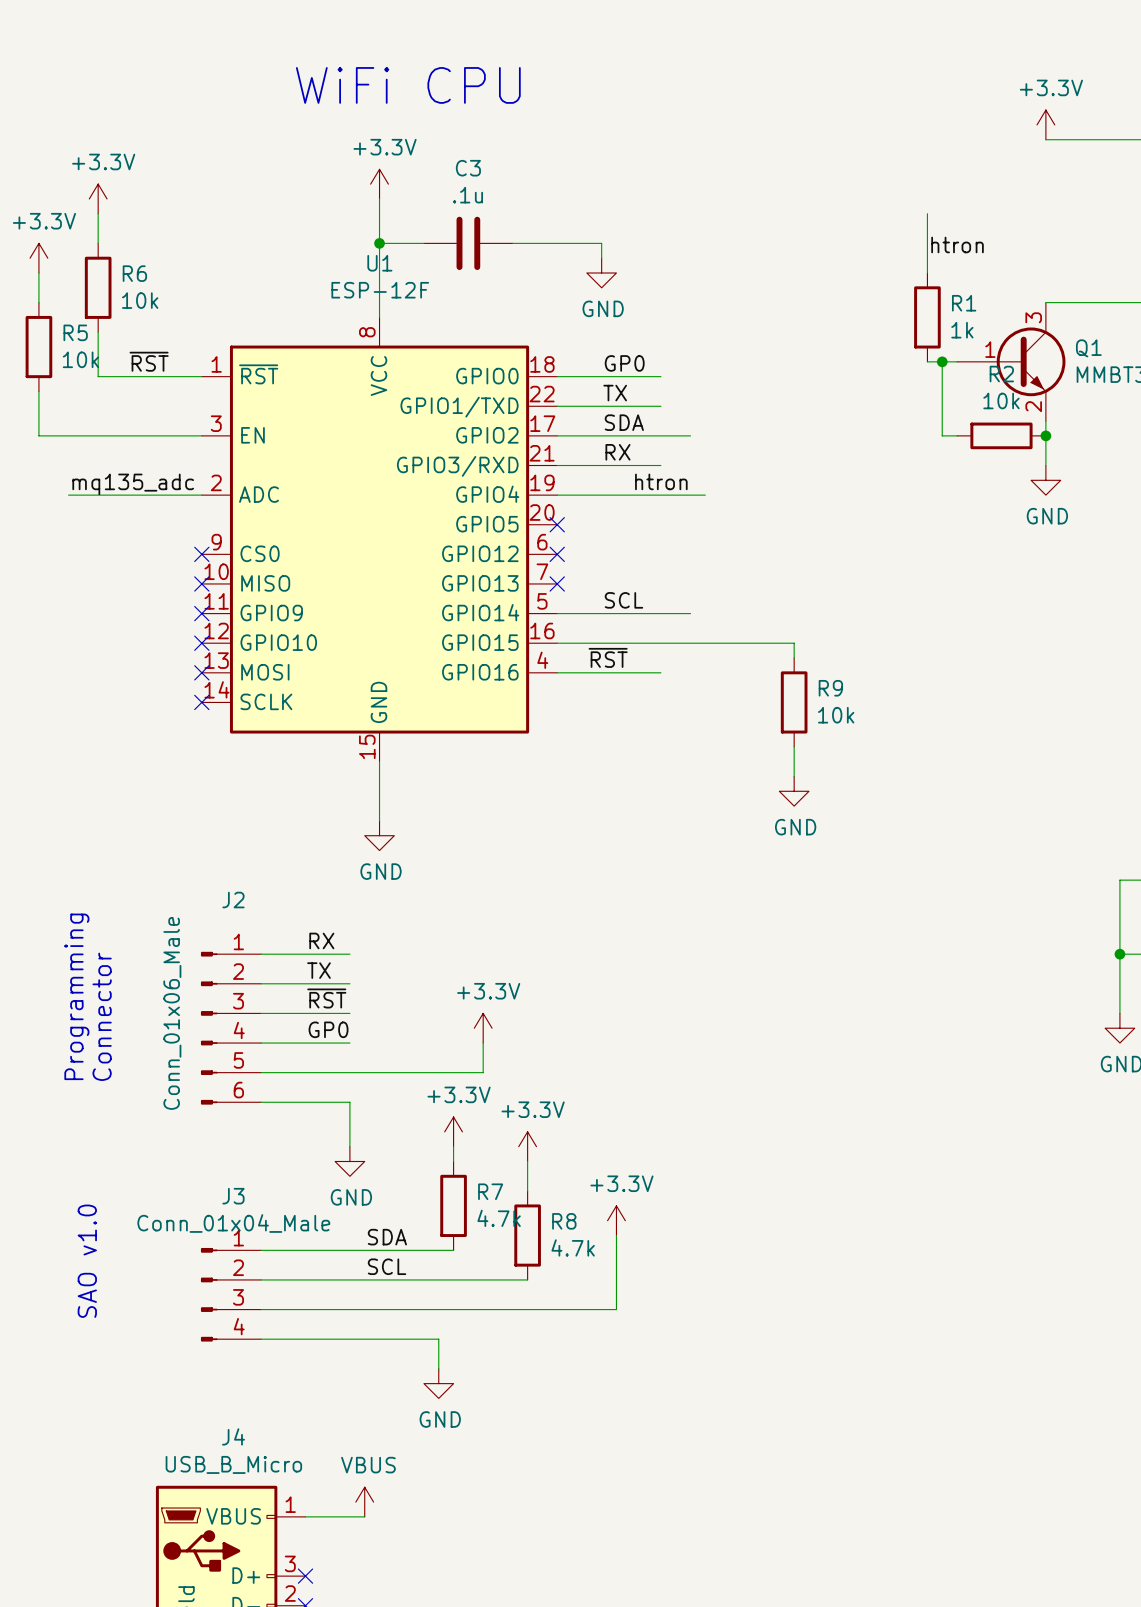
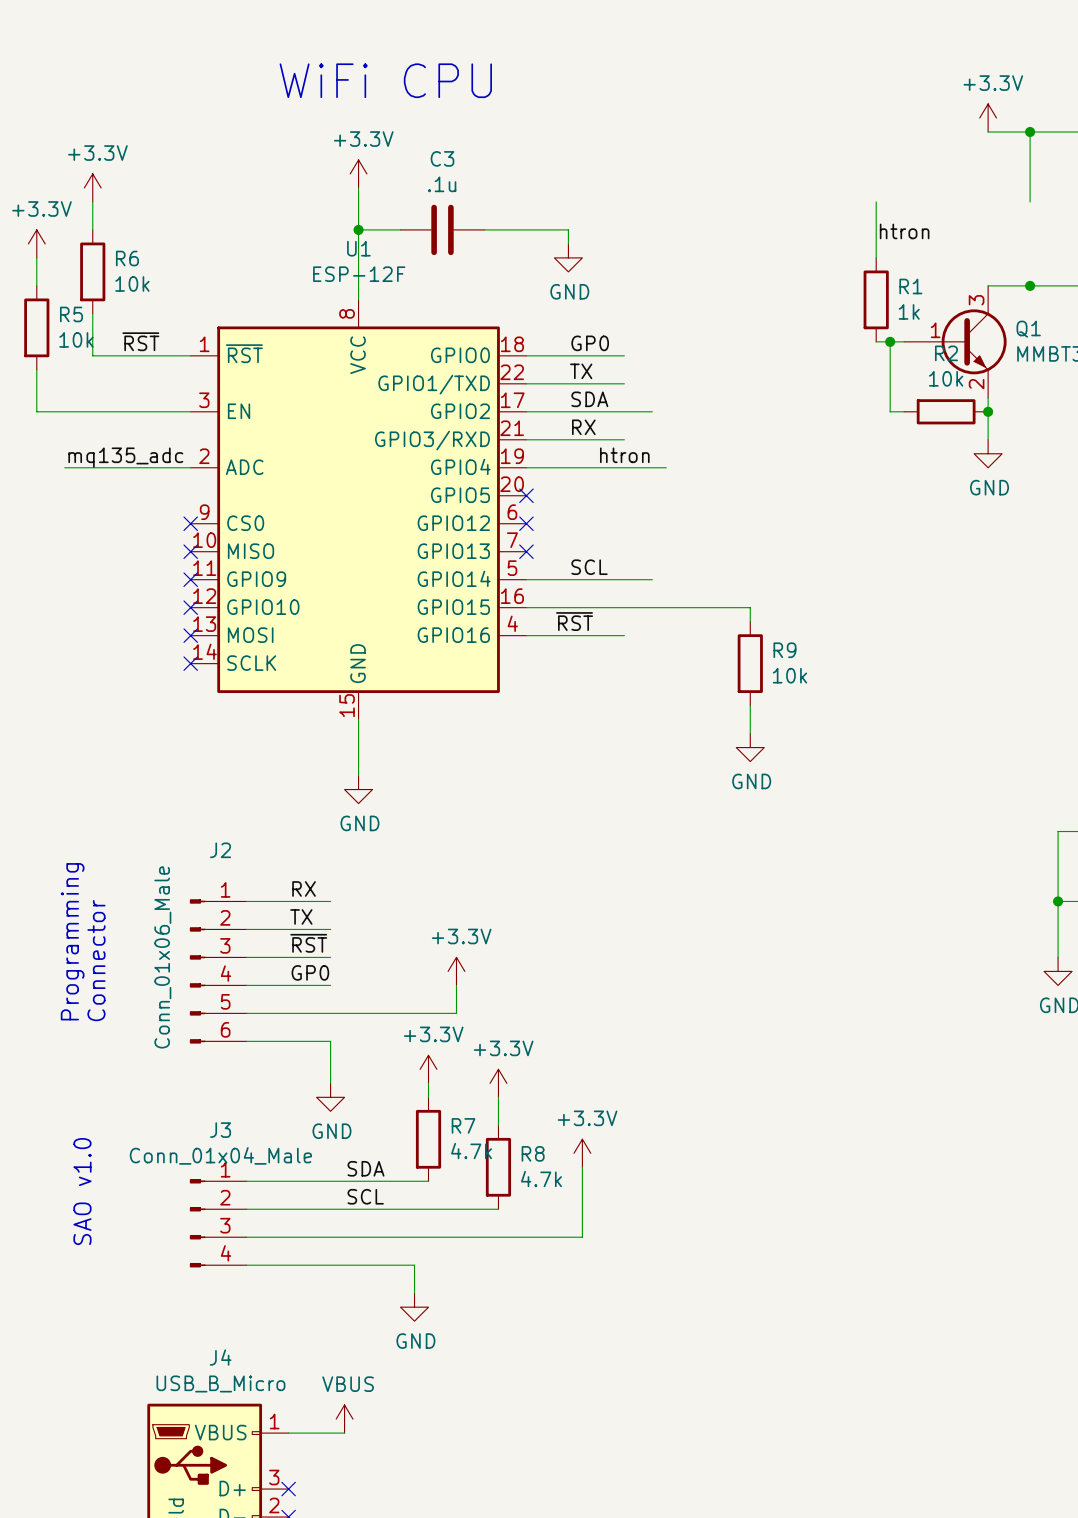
wire: none -> (1030, 132) (1030, 201)
junction: none -> (1030, 132)
junction: none -> (1030, 285)

